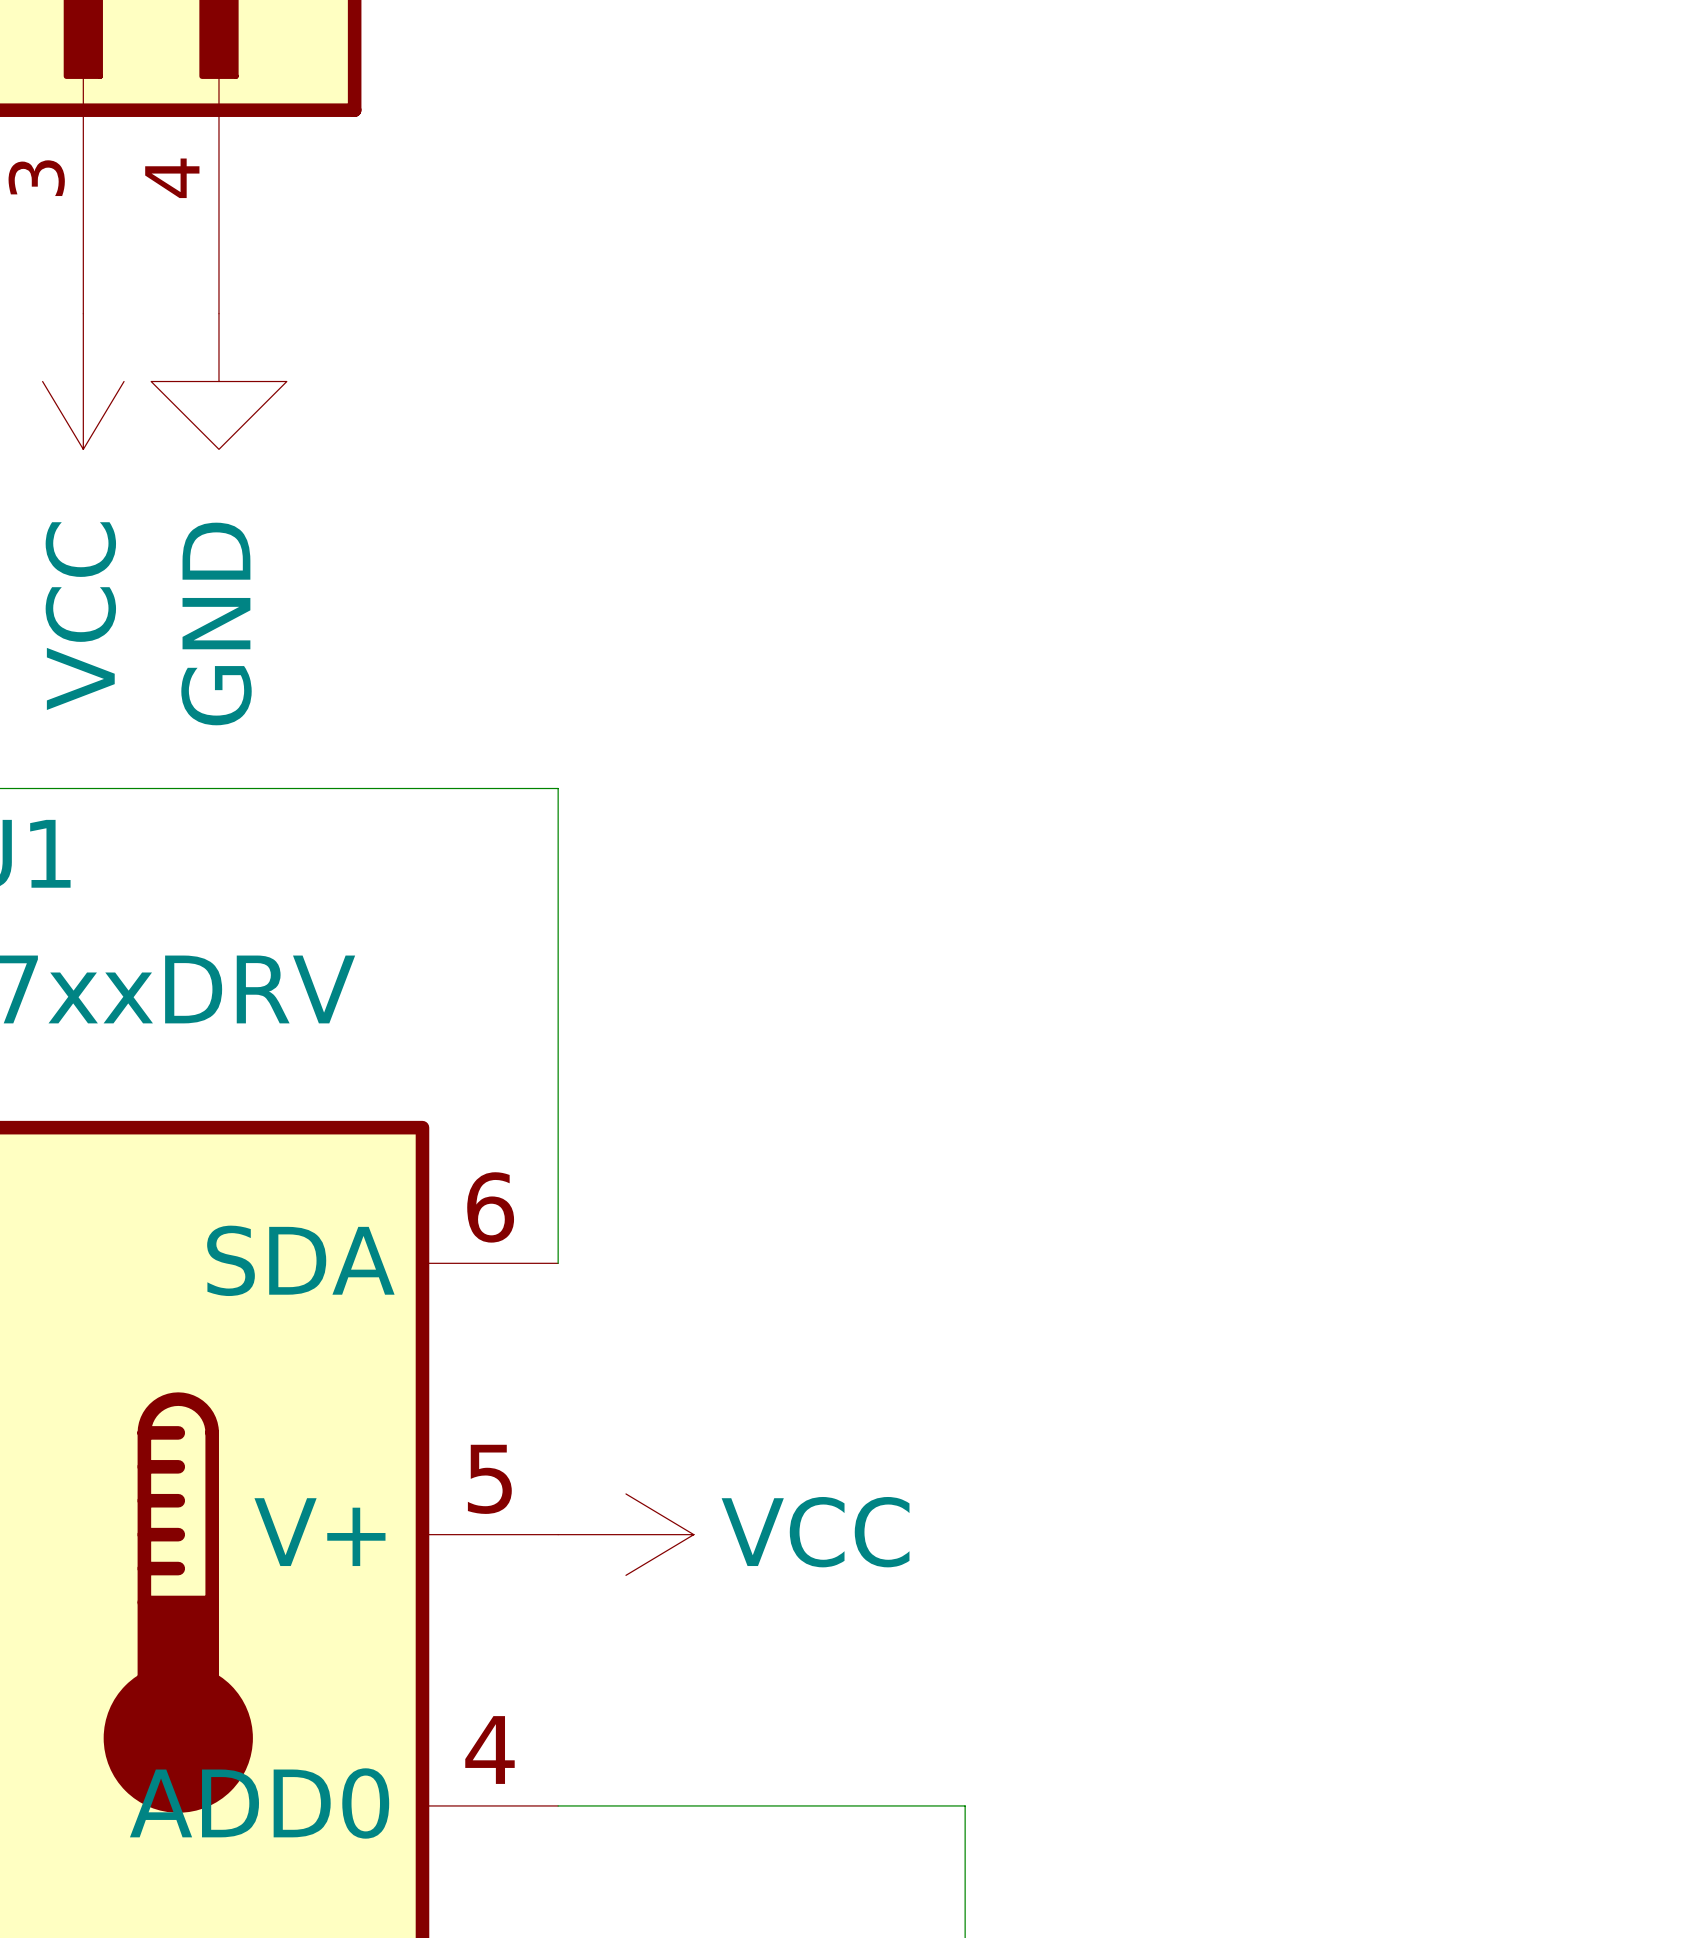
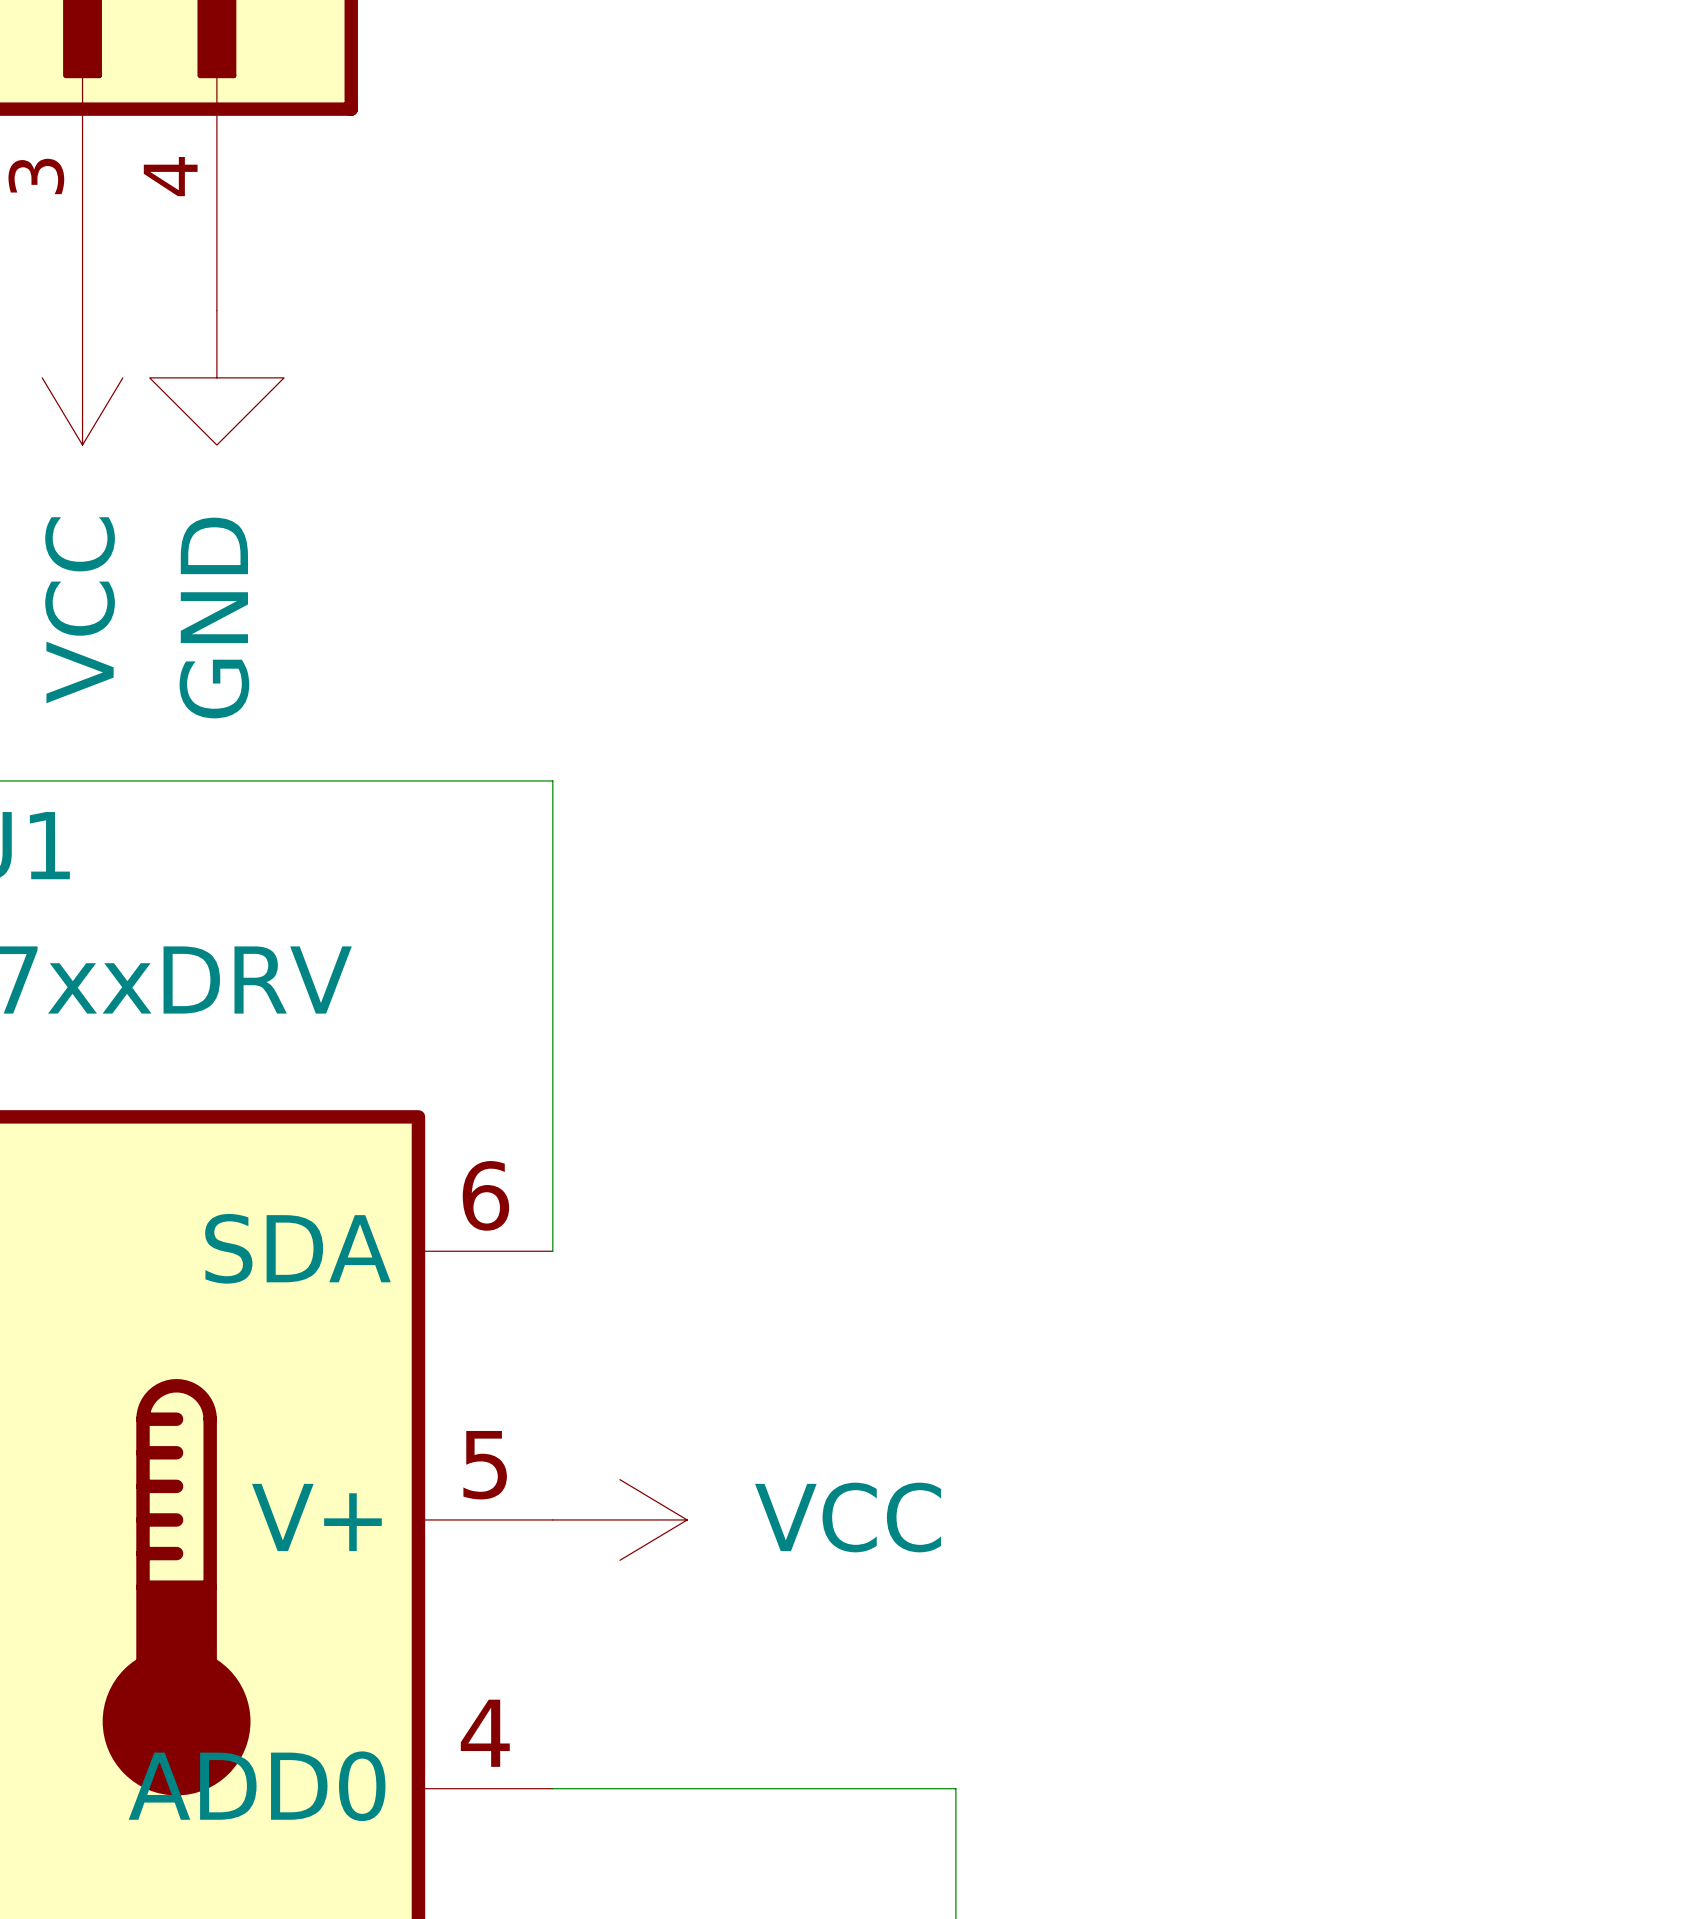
power symbol text position: VCC (815, 1532) -> VCC (848, 1517)

